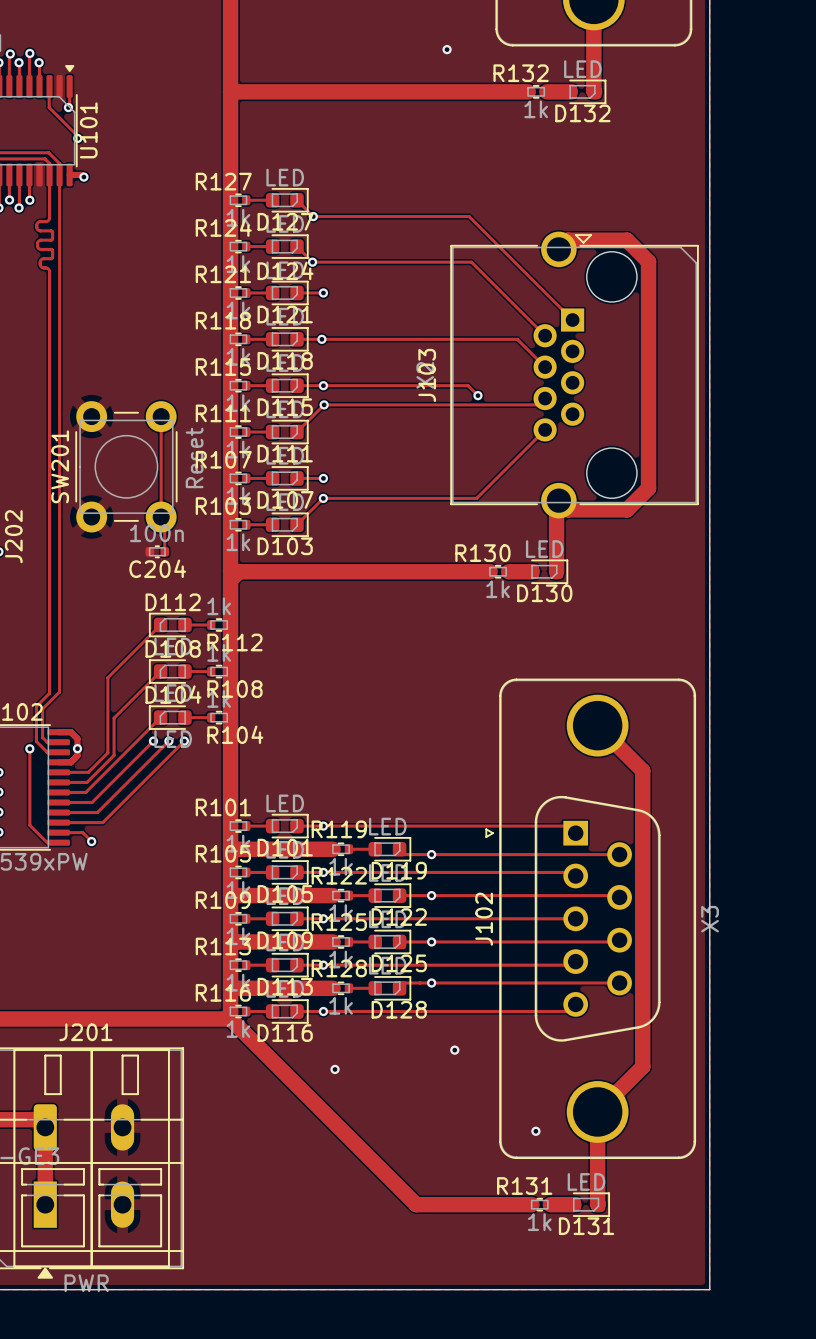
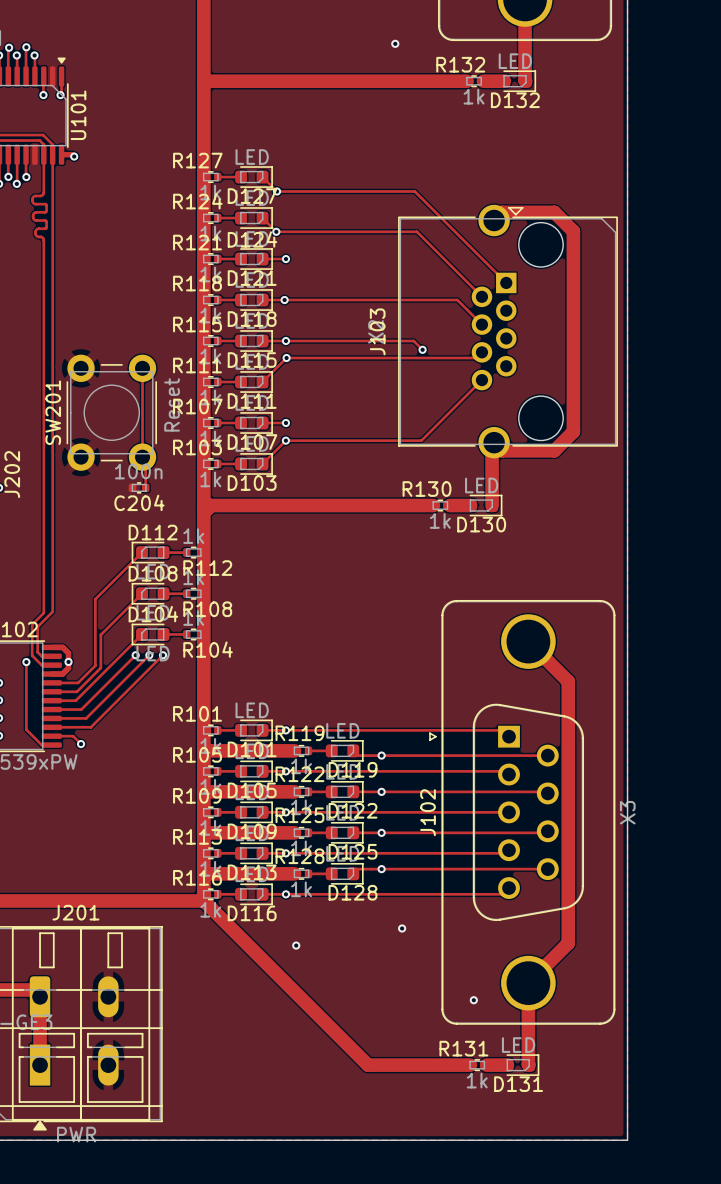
track: (49, 107) (77, 136) (77, 138) -> none
via position: (77, 138) -> (43, 95)

